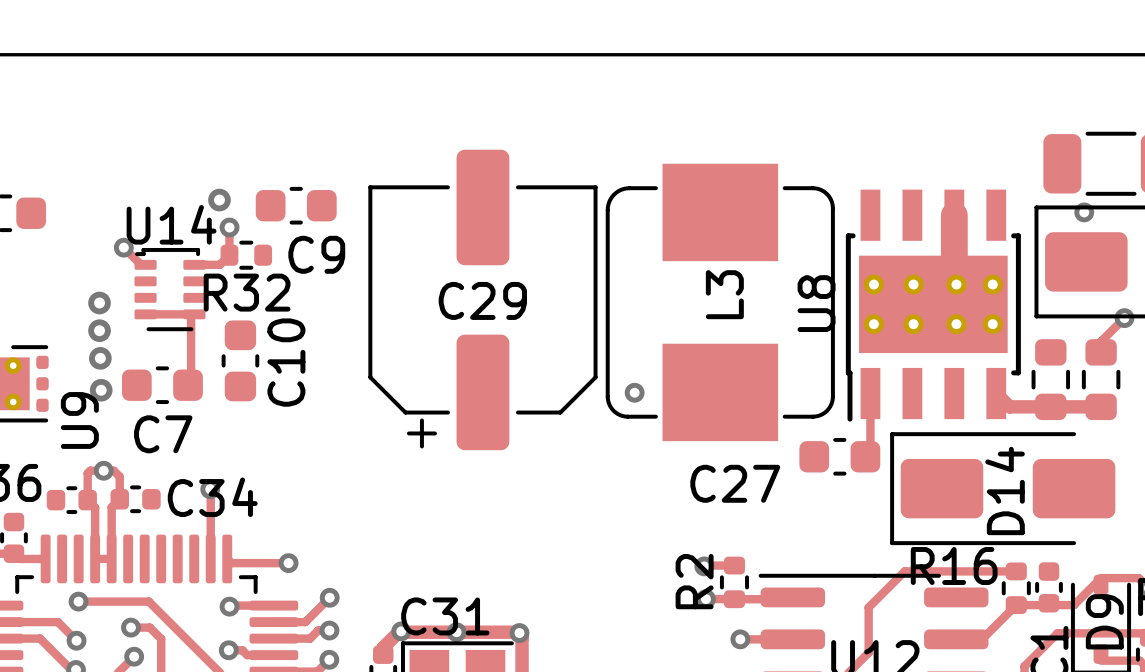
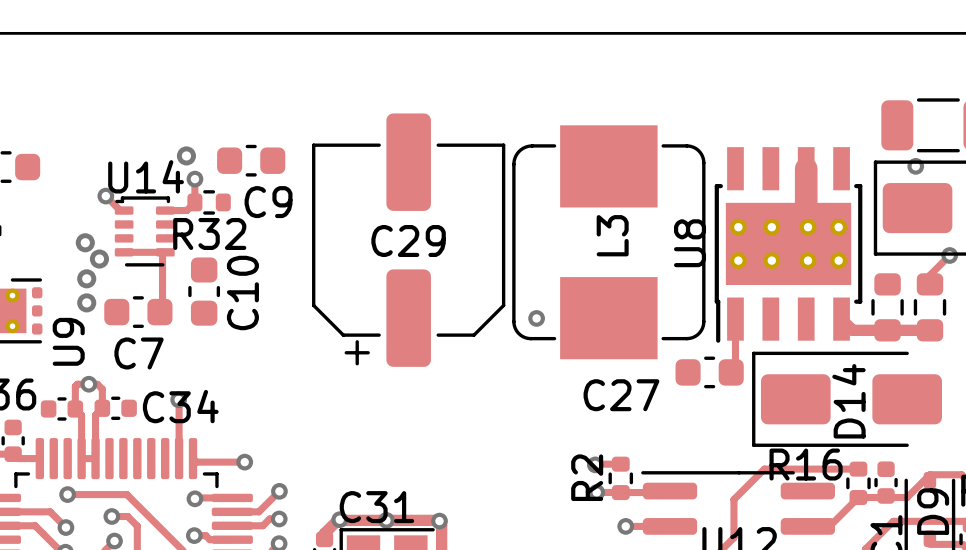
via: none -> (99, 259)
via: (99, 330) -> none
via: none -> (86, 278)
via: (100, 358) -> none
via: none -> (86, 302)
via: (101, 390) -> none

